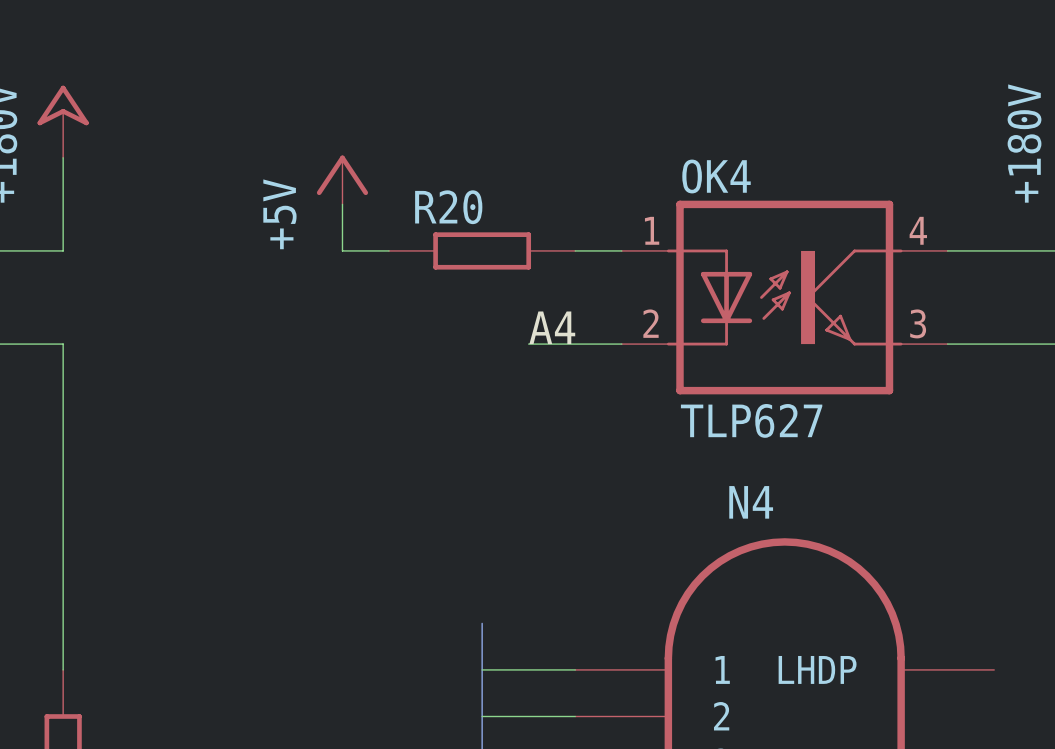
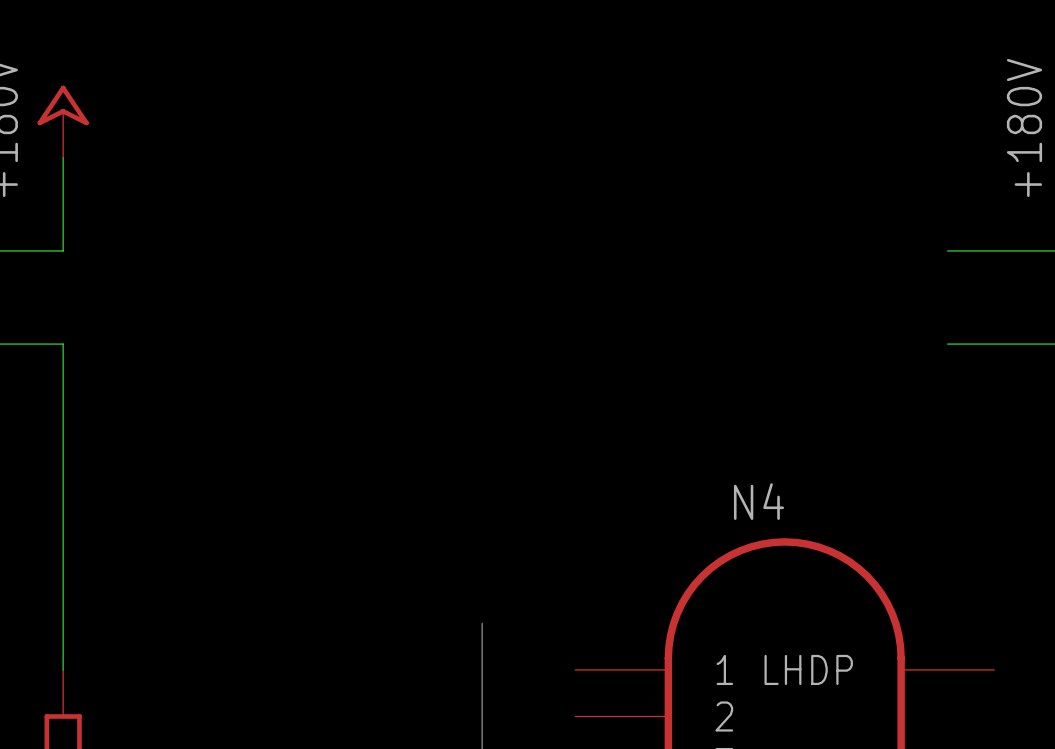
power symbol: +5V (342, 179) -> none
wire: (342, 204) (342, 250) (389, 250) -> none
R20: (482, 250) -> none
wire: (575, 250) (621, 250) -> none
OK4: TLP627 (784, 297) -> none
label: A4 (552, 327) -> none
wire: (528, 344) (621, 344) -> none
wire: (482, 669) (575, 669) -> none
wire: (482, 716) (575, 716) -> none

